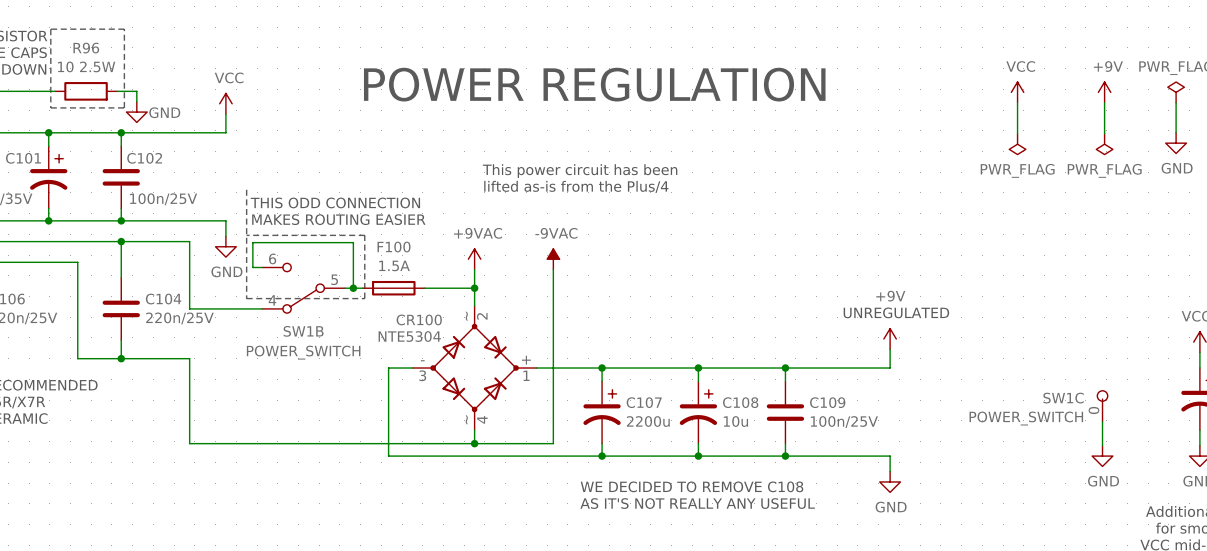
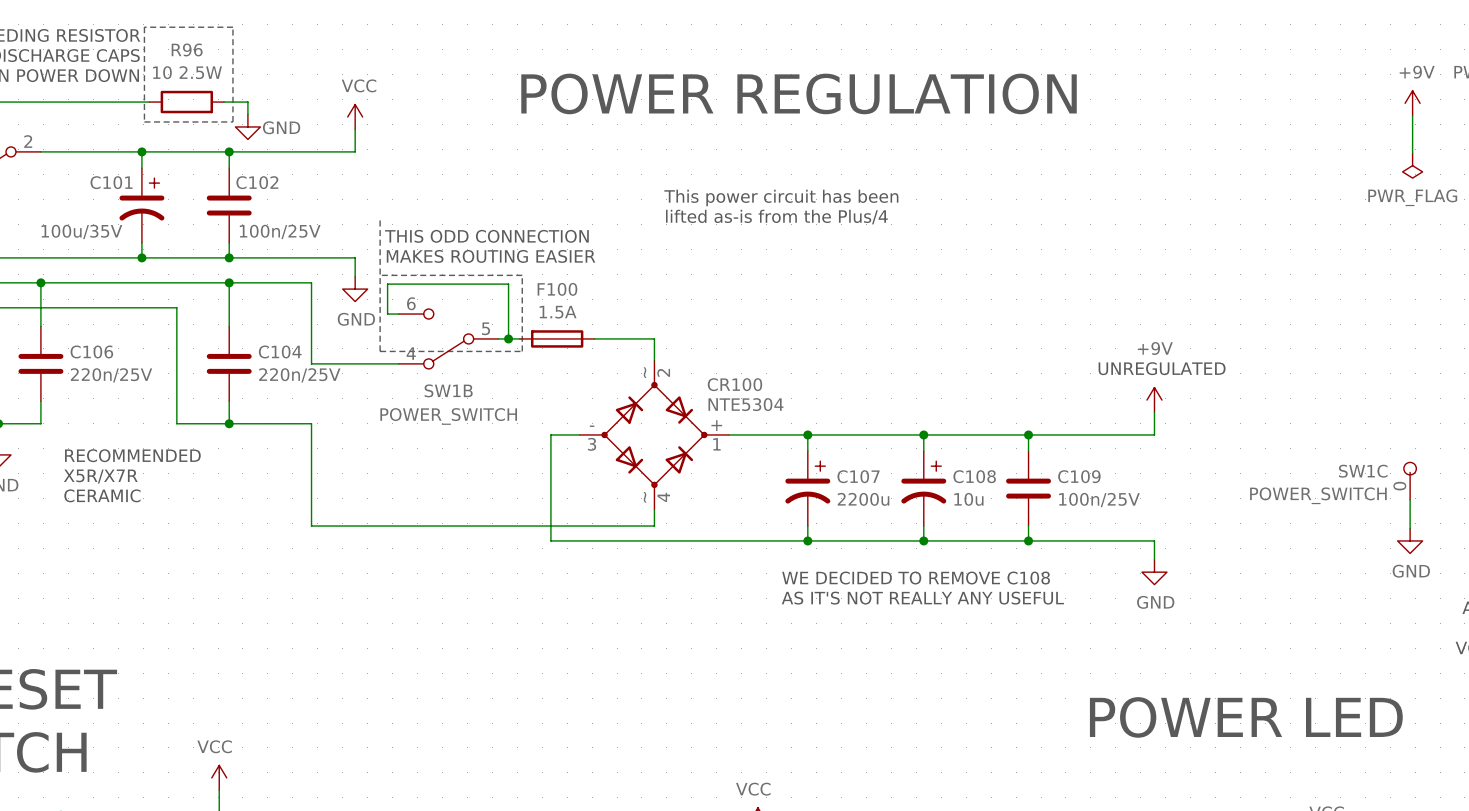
power symbol: VCC (1017, 92) -> none
wire: (1017, 102) (1017, 133) -> none
power symbol: PWR_FLAG (1017, 144) -> none
power symbol: +9VAC (474, 259) -> none
power symbol: -9VAC (553, 259) -> none
wire: (474, 269) (474, 288) -> none
wire: (553, 269) (553, 443) (474, 443) -> none
junction: (474, 288) -> none
CR100 name position: CR100 (419, 319) -> CR100 (734, 384)
CR100 value position: NTE5304 (409, 336) -> NTE5304 (745, 404)
junction: (474, 443) -> none

